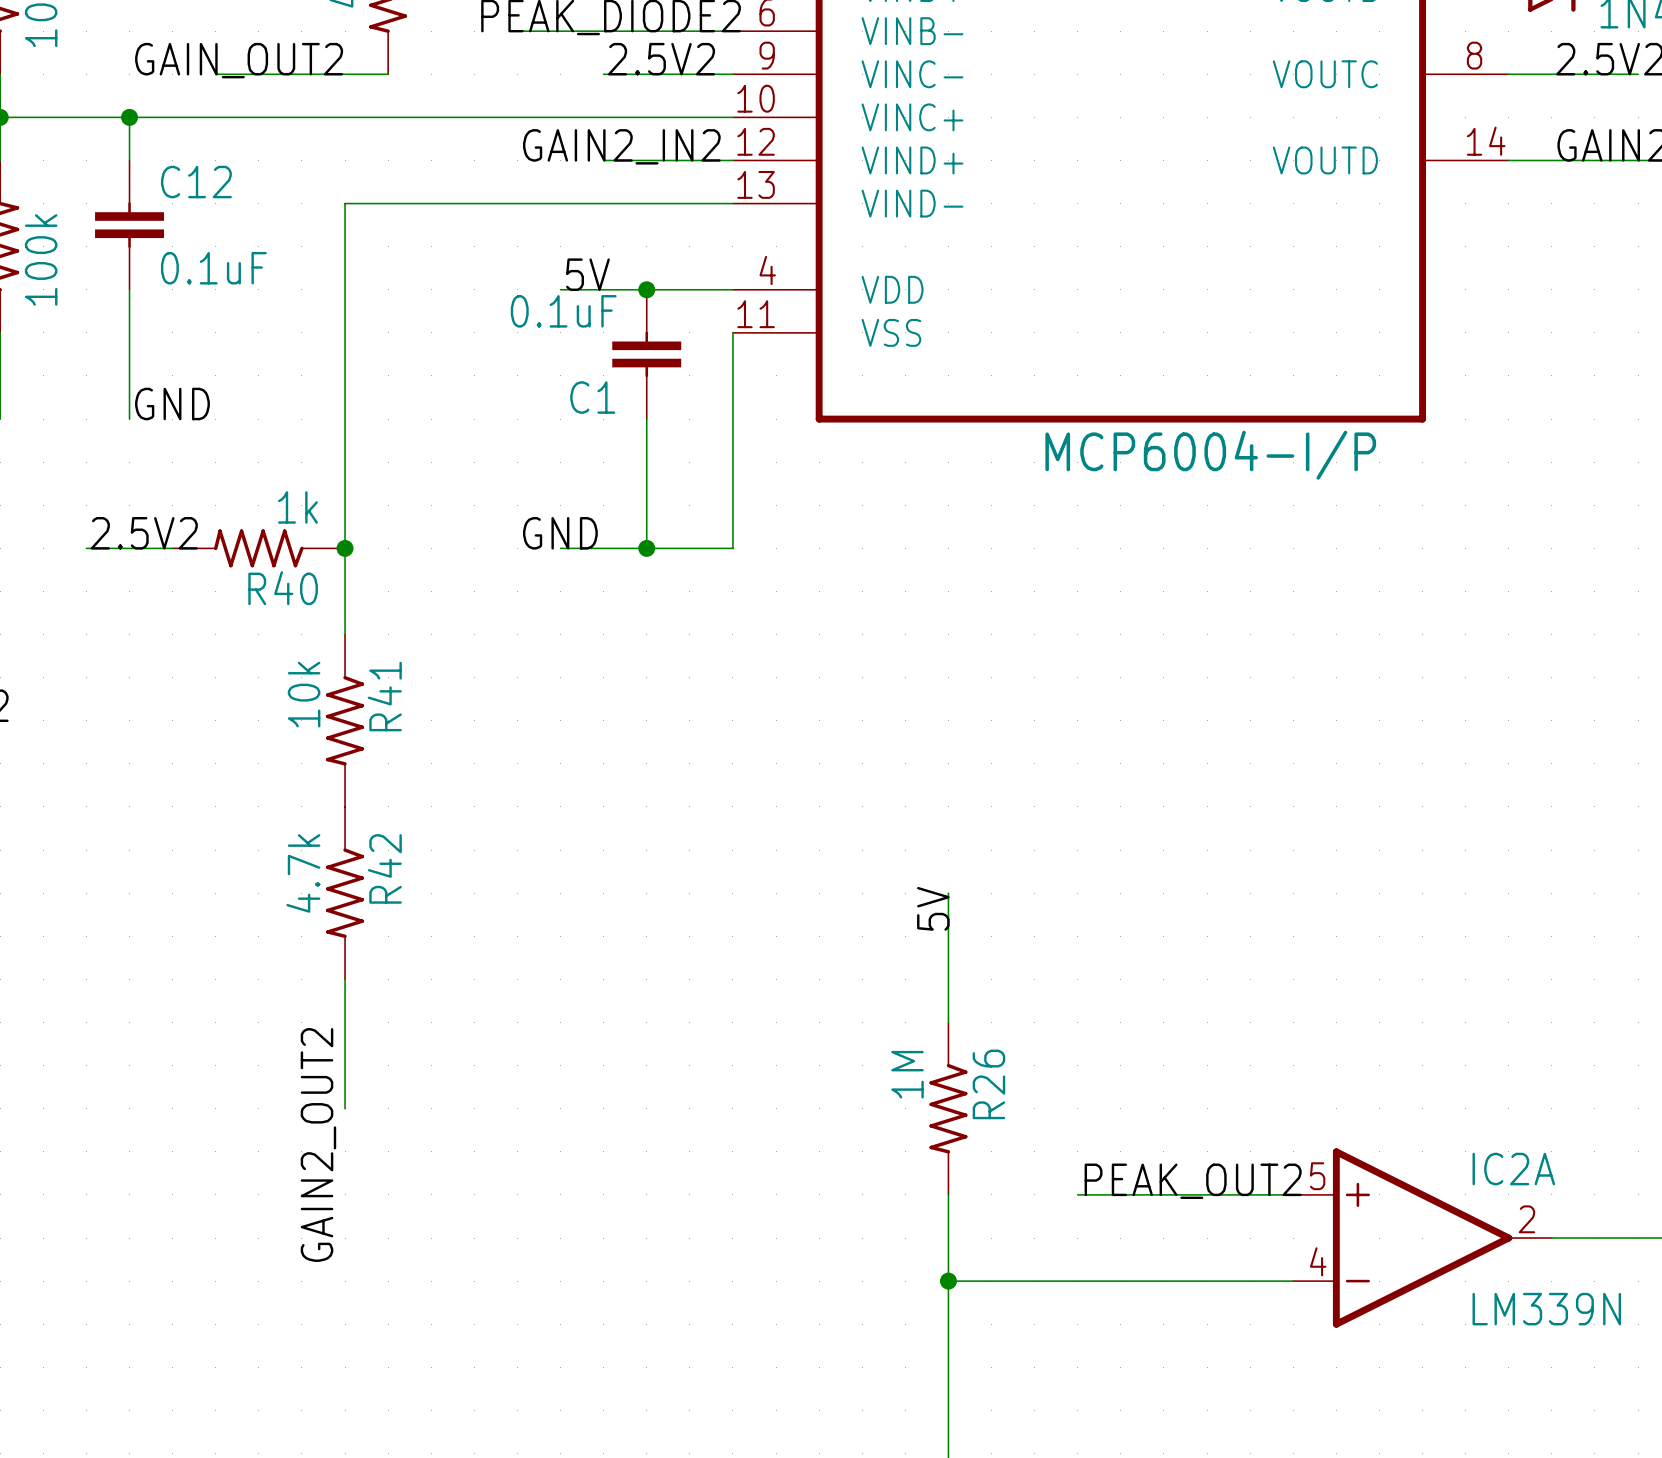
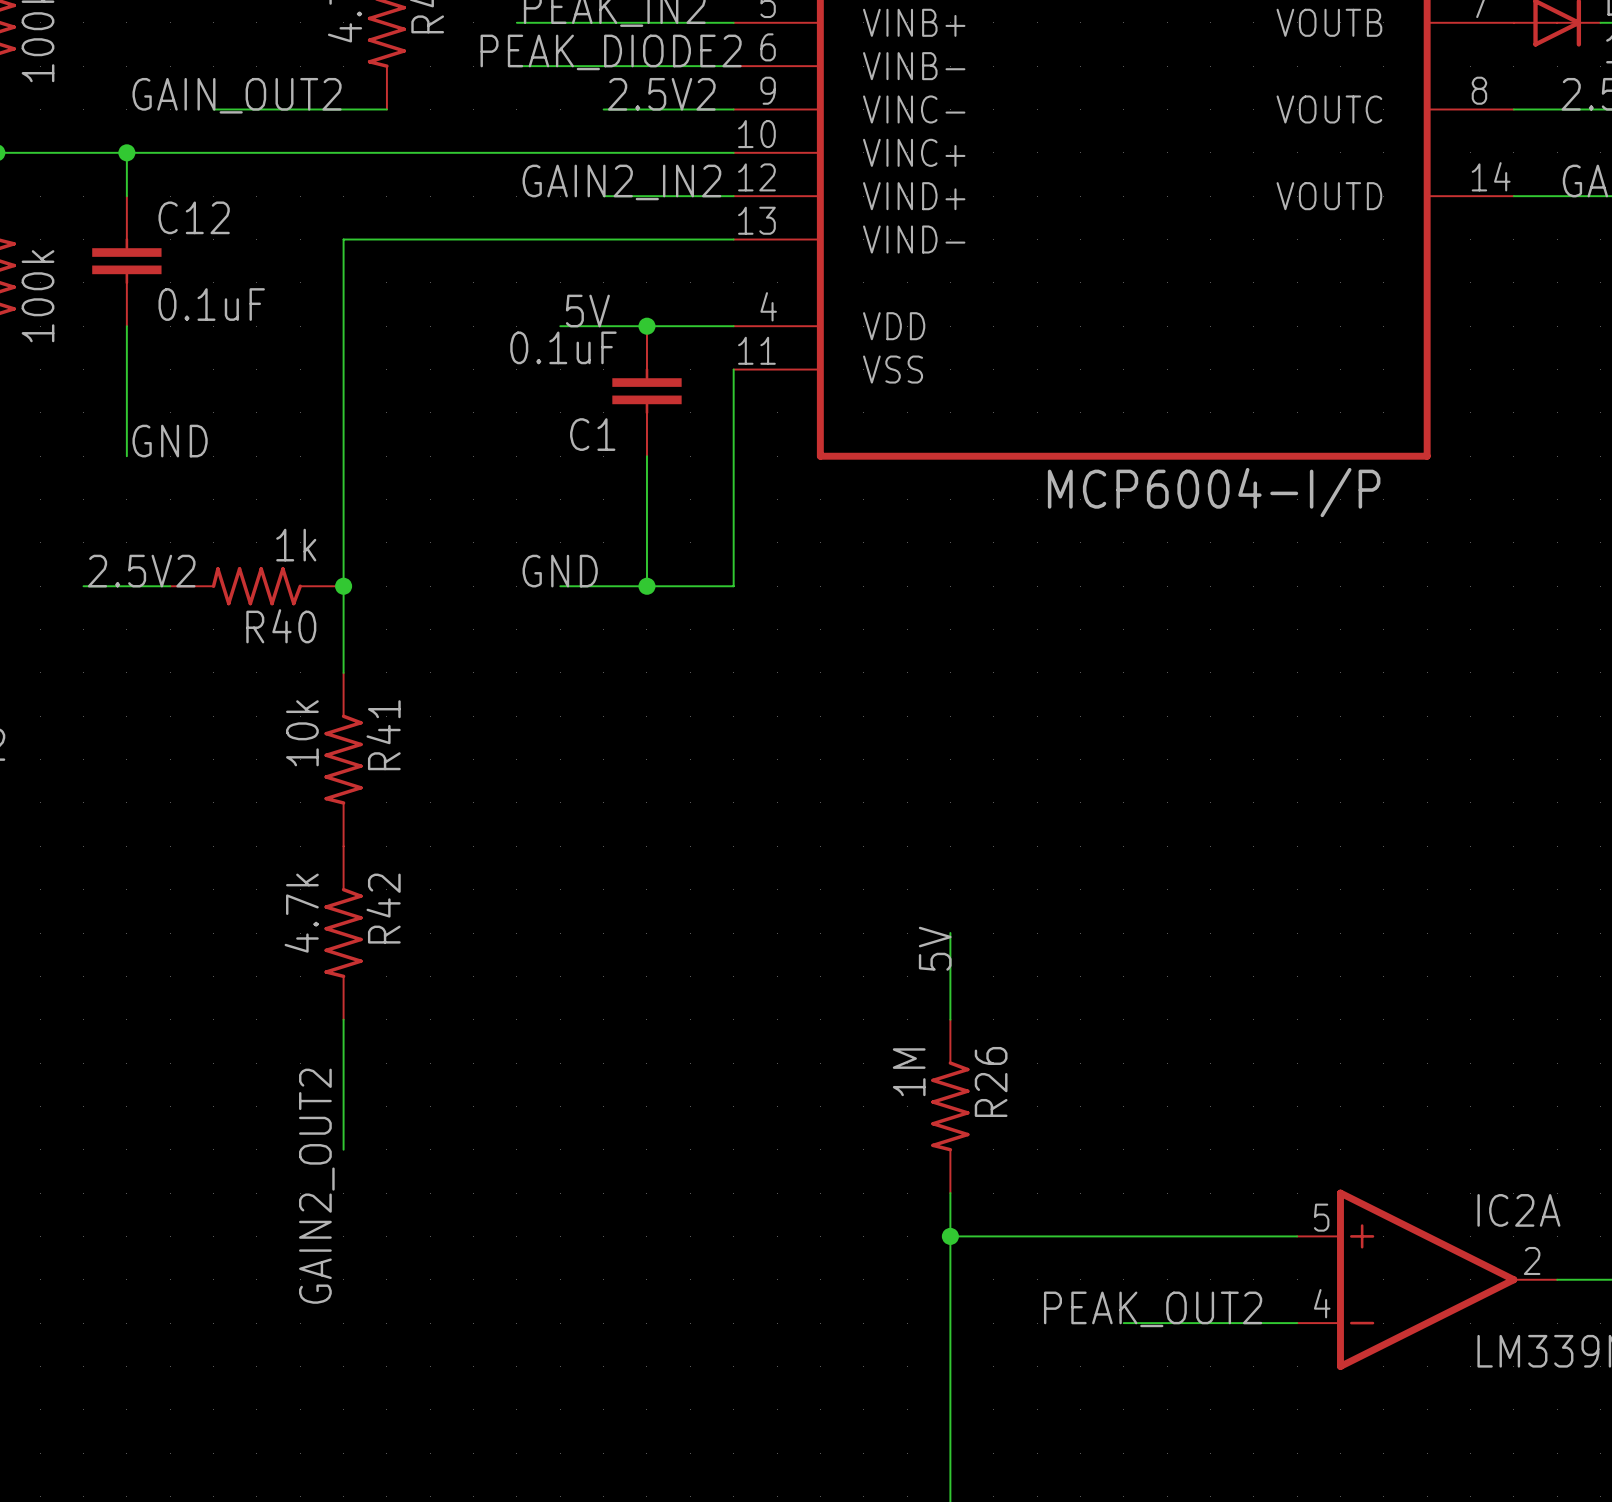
R26 position: (948, 1108) -> (950, 1106)
wire: none -> (950, 1193) (950, 1236) (1080, 1236)
label position: PEAK_OUT2 (1193, 1181) -> PEAK_OUT2 (1153, 1309)
wire: (948, 1281) (1120, 1281) -> none
junction position: (948, 1281) -> (950, 1236)

